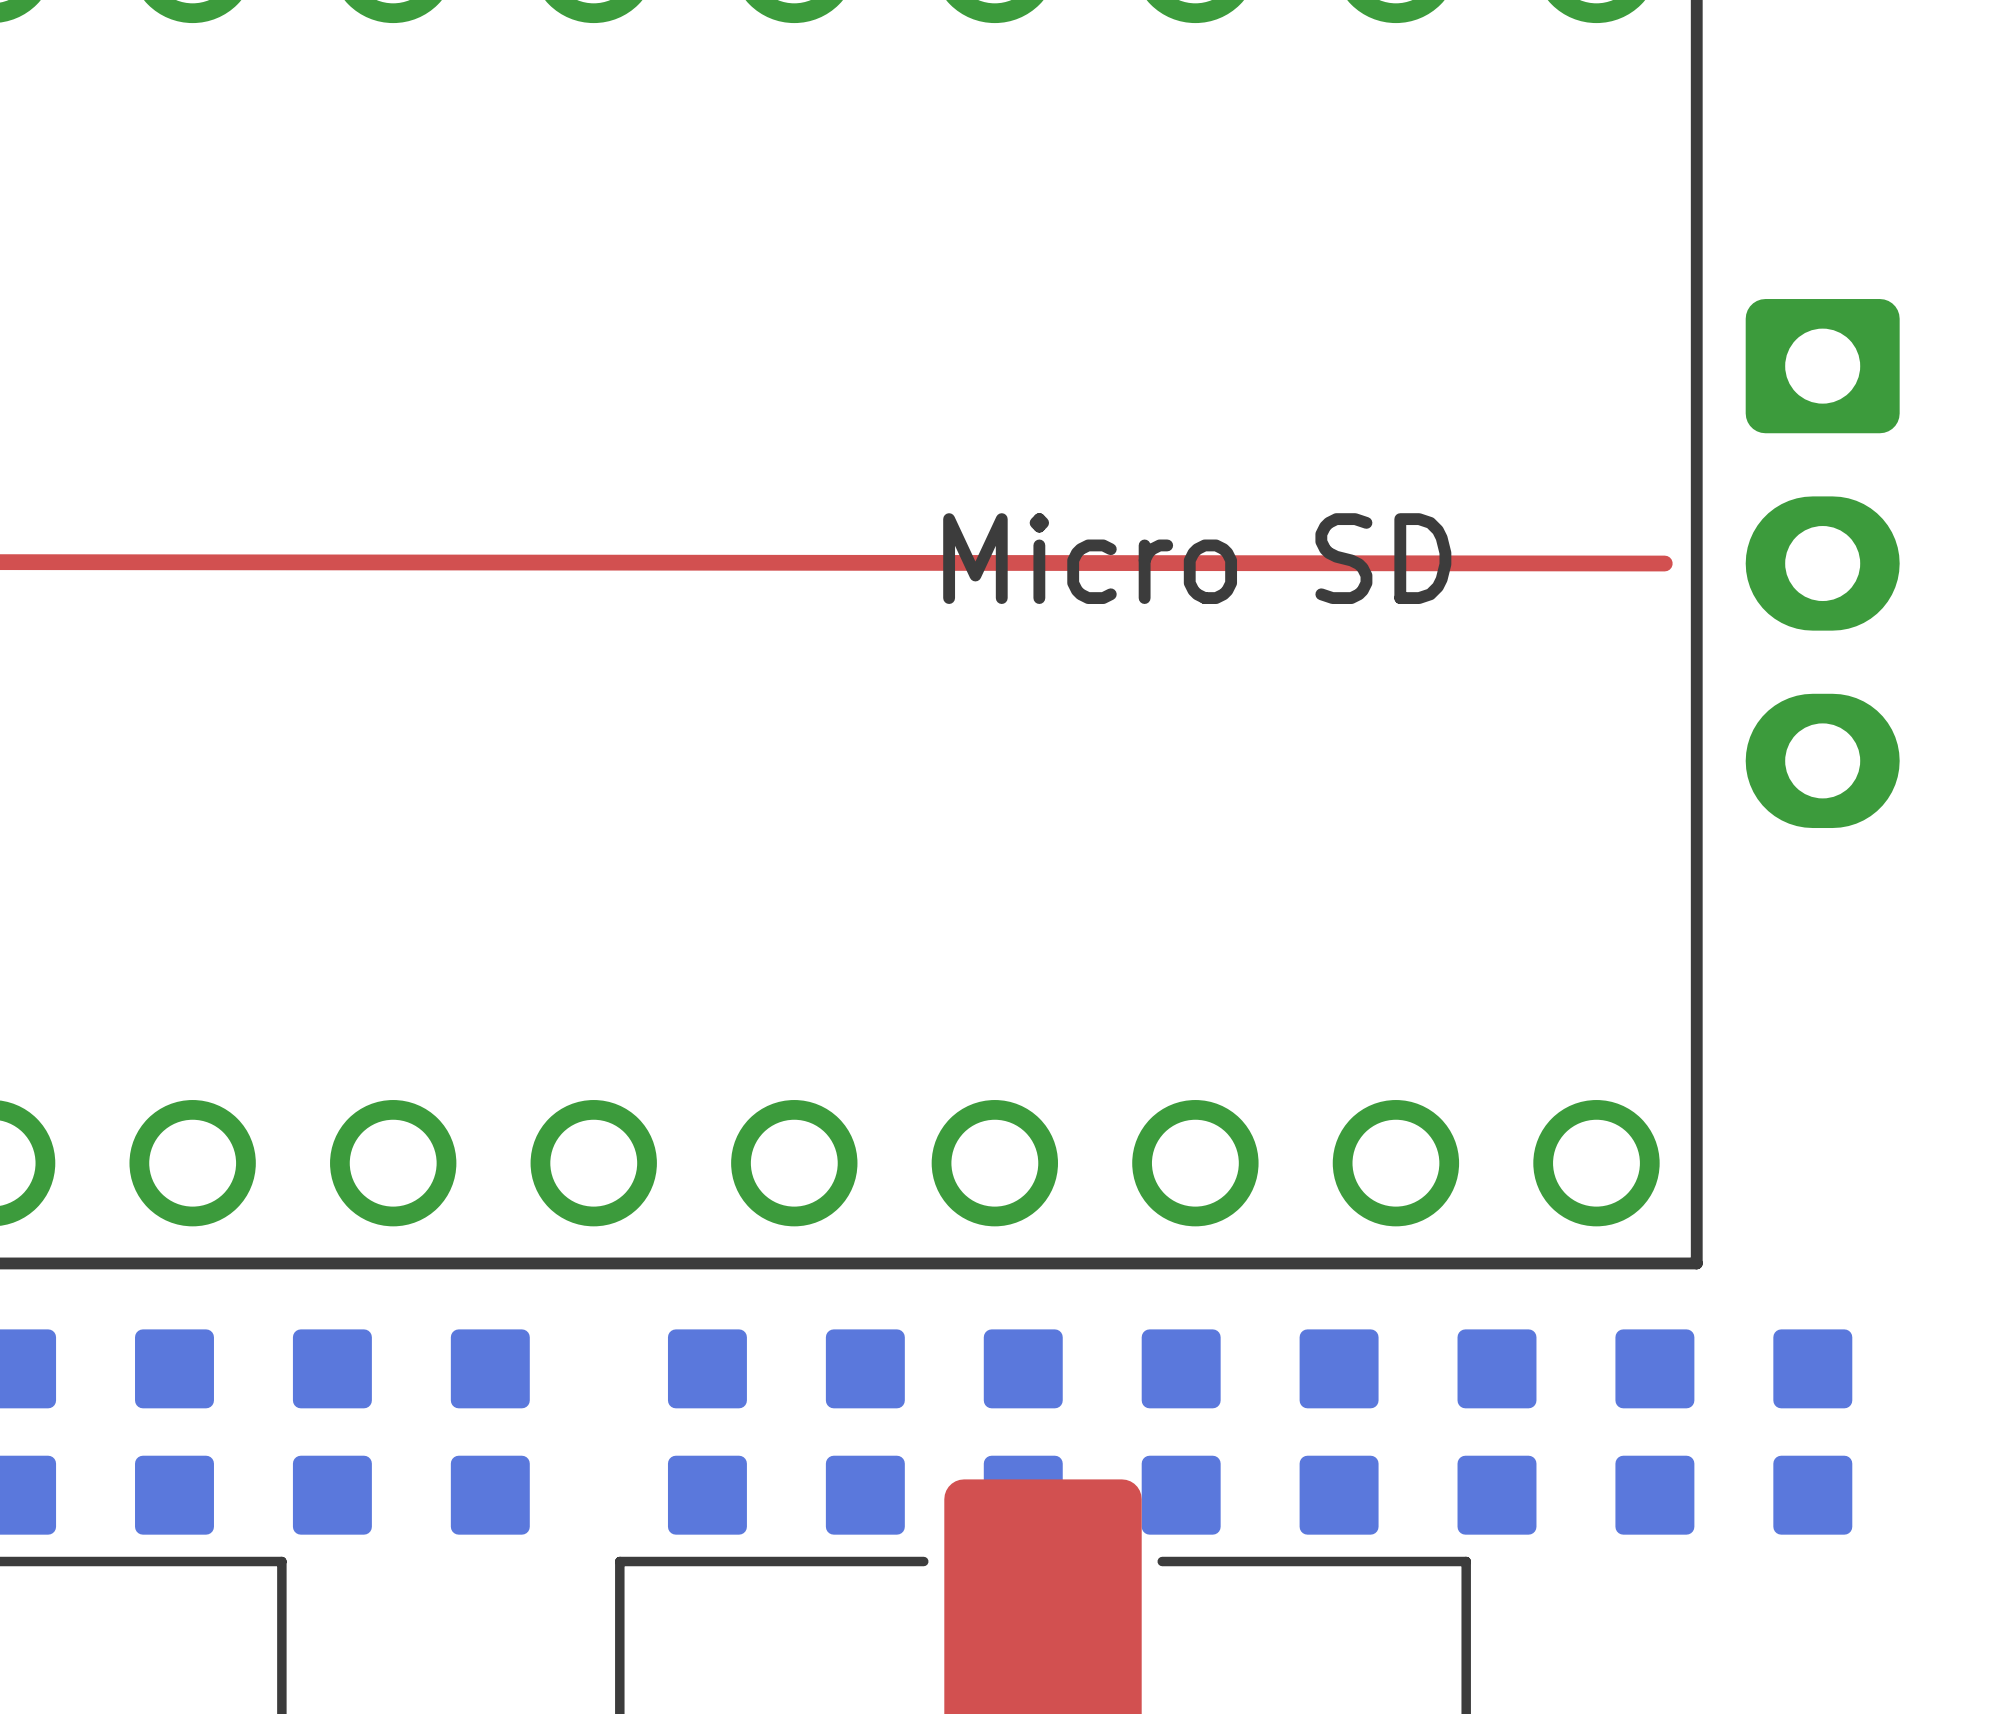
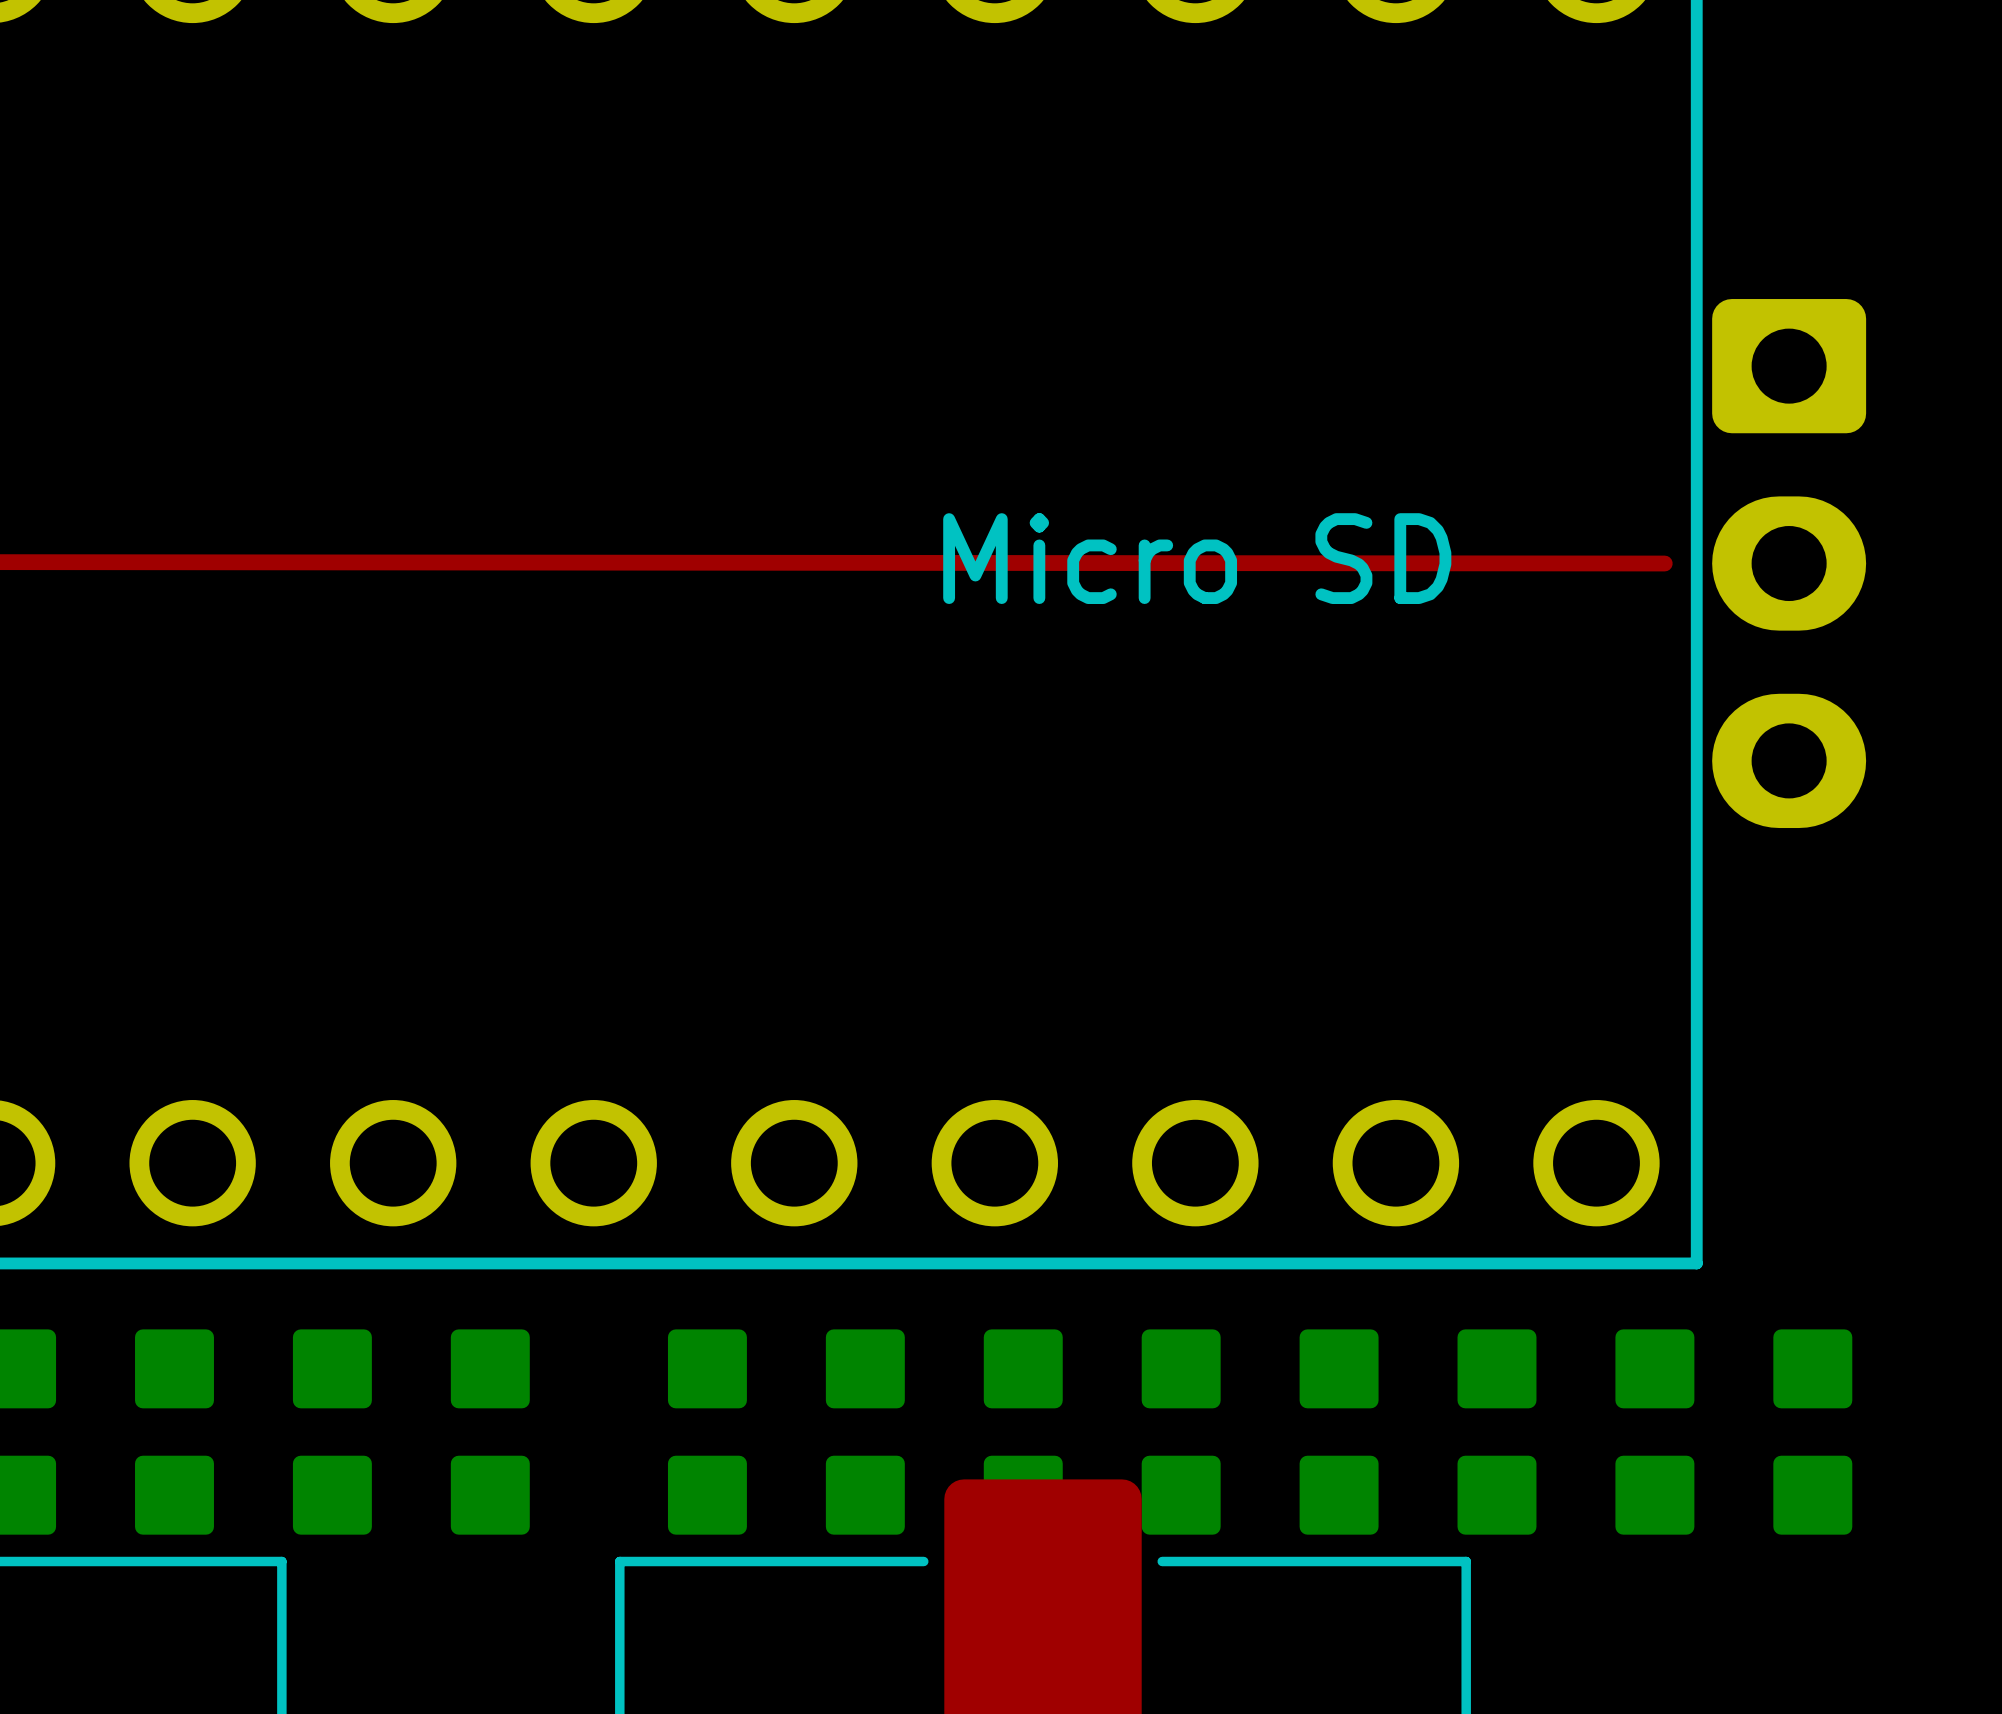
part position: (1822, 563) -> (1789, 563)

